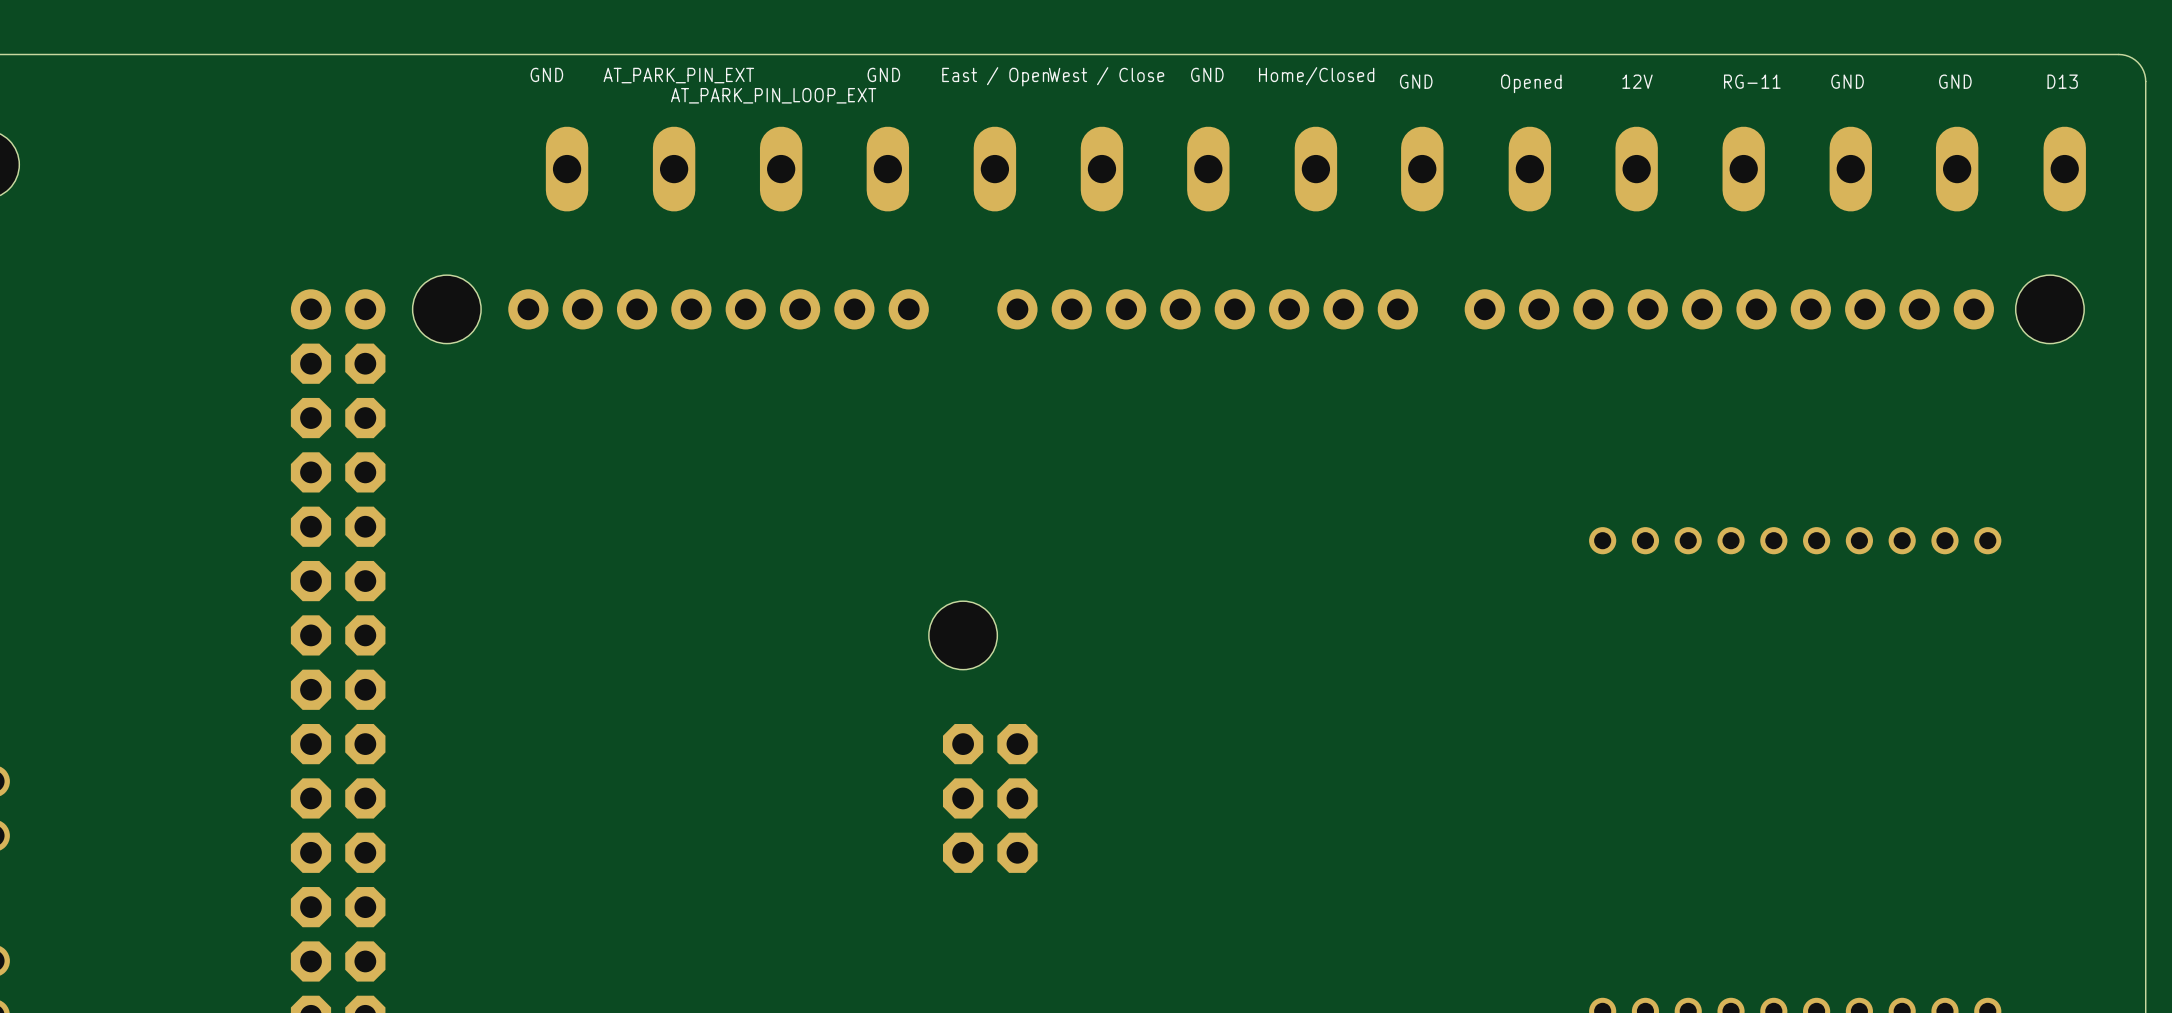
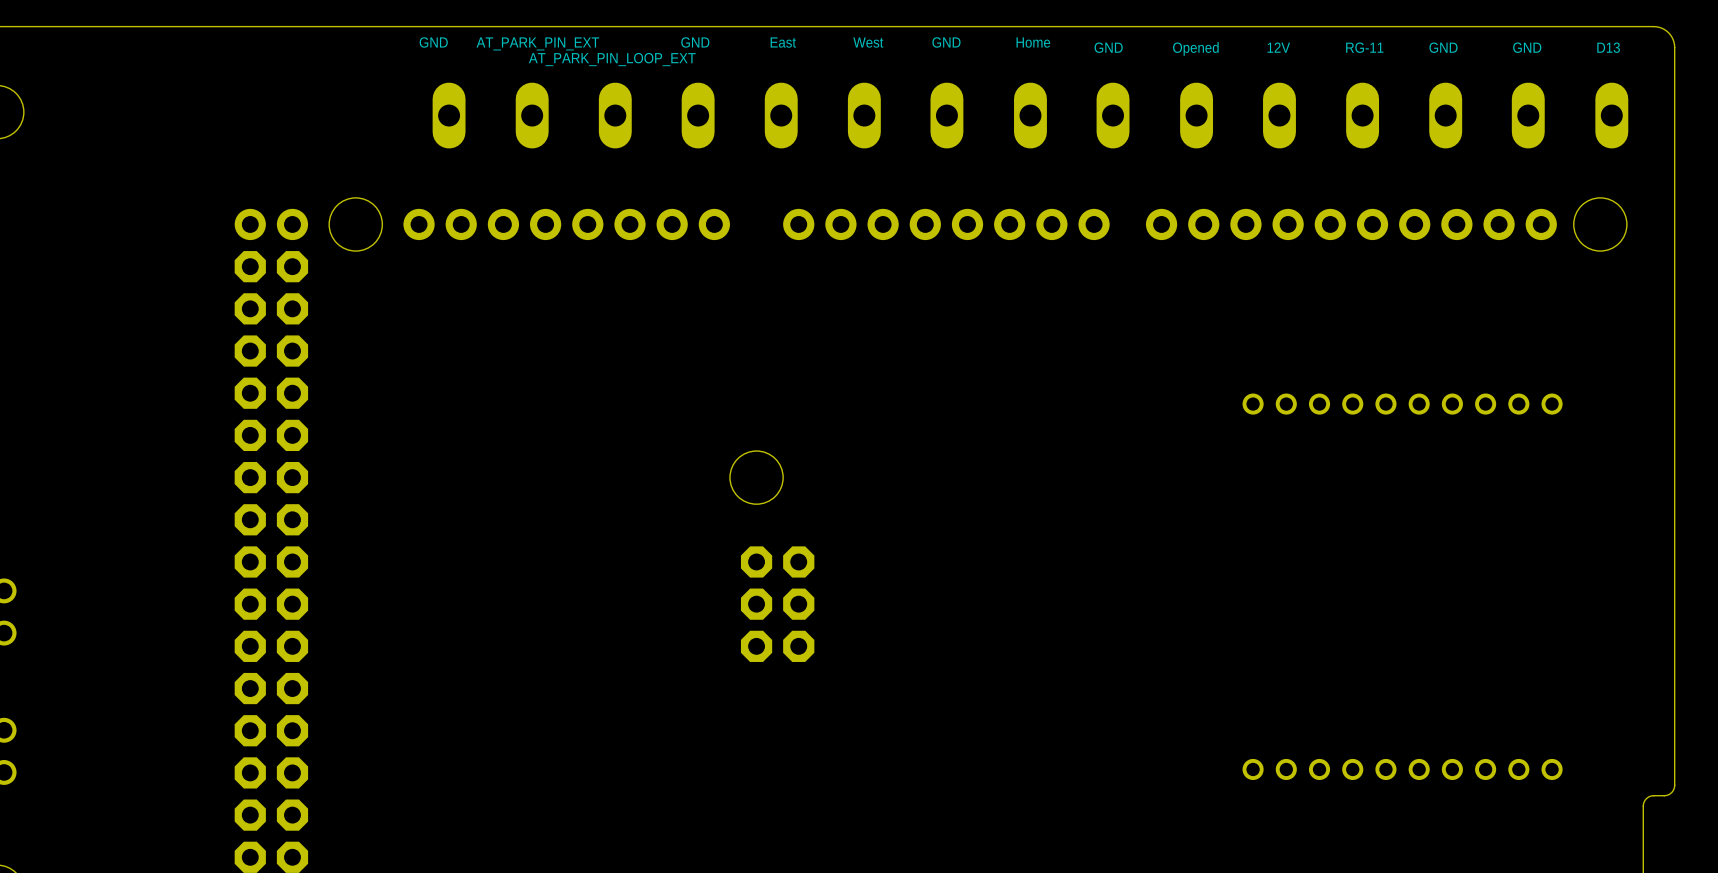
text: none -> East (783, 42)
text: none -> West (868, 42)
text: none -> Home (1033, 42)
text: East / Open (995, 76) -> none
text: West / Close (1106, 76) -> none
text: Home/Closed (1316, 76) -> none

